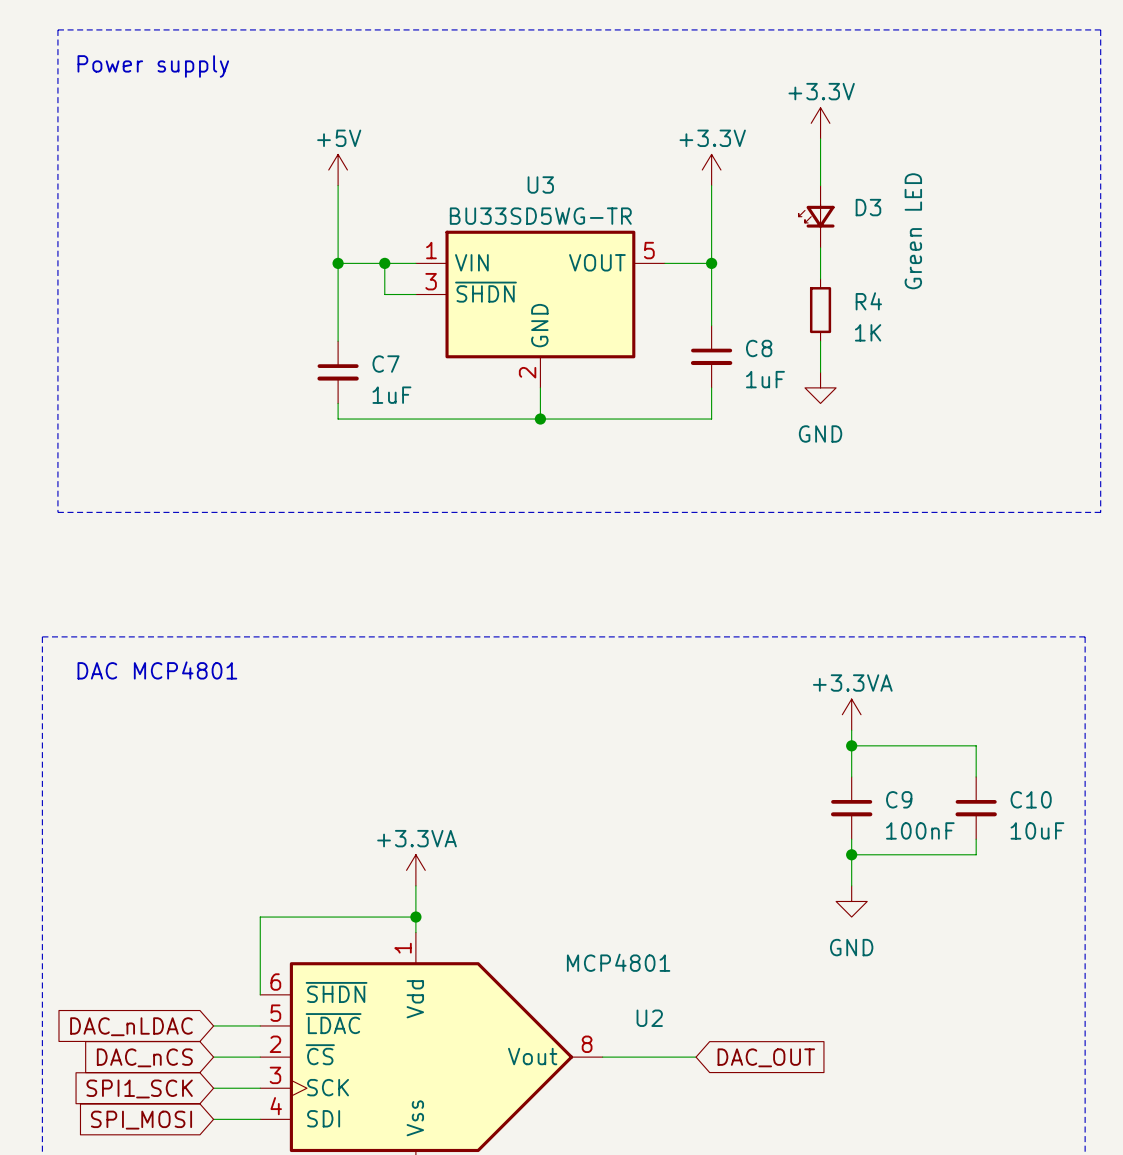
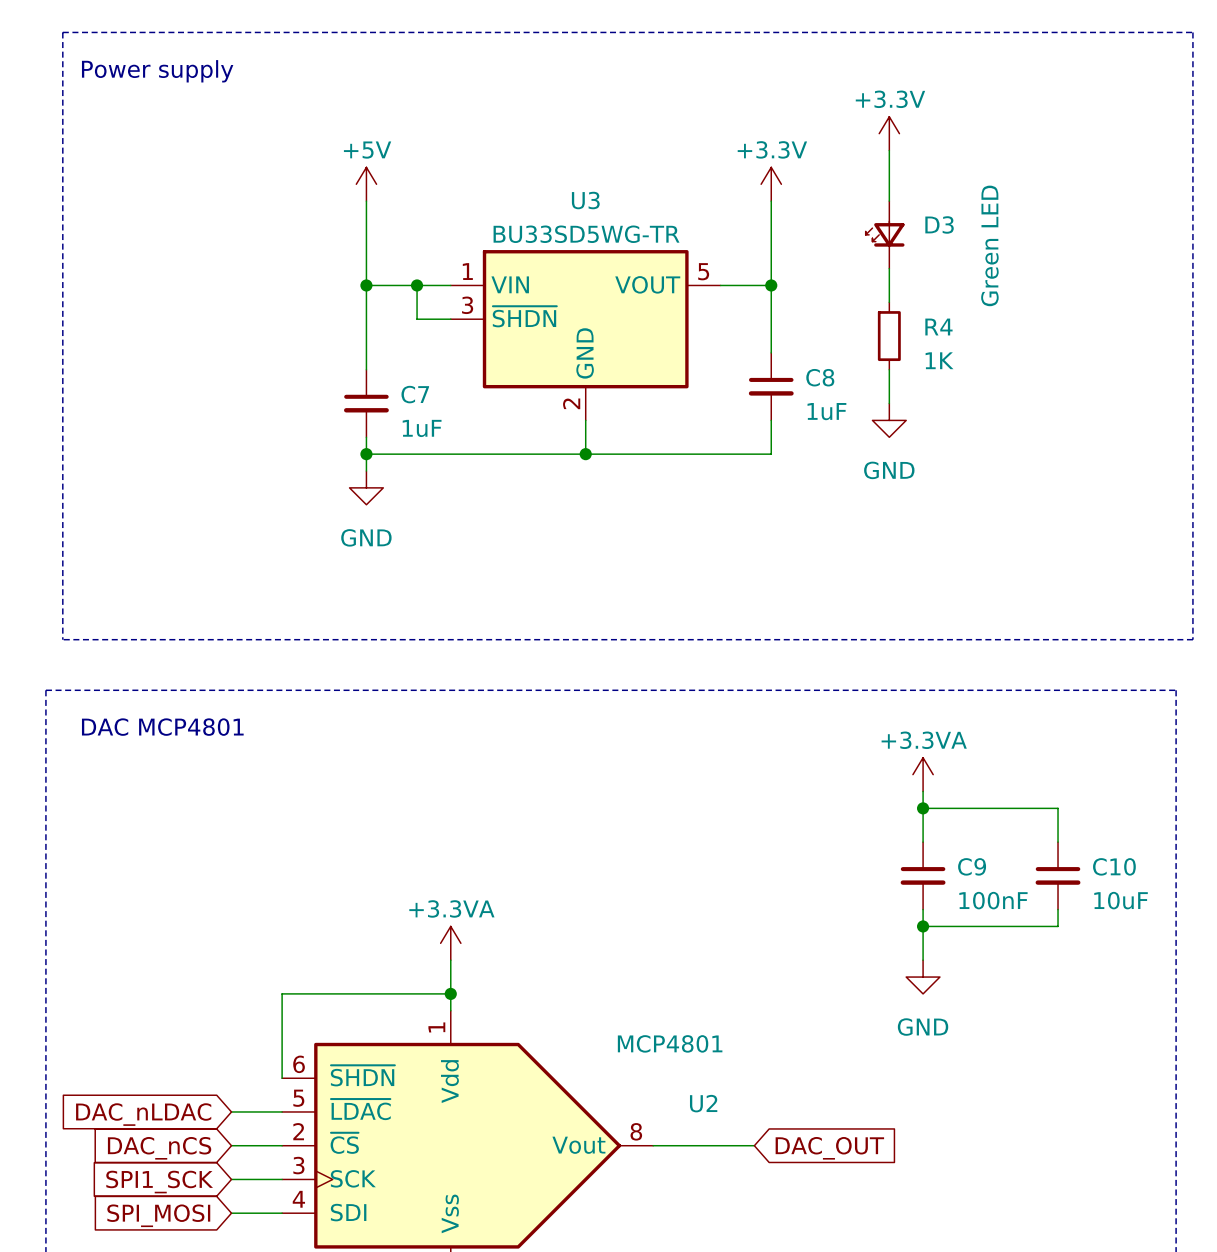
wire: none -> (366, 454) (366, 471)
junction: none -> (366, 454)
power symbol: none -> GND (366, 487)
line: (57, 512) (1100, 512) -> (62, 555) (62, 639) (1192, 639) (1192, 555)

